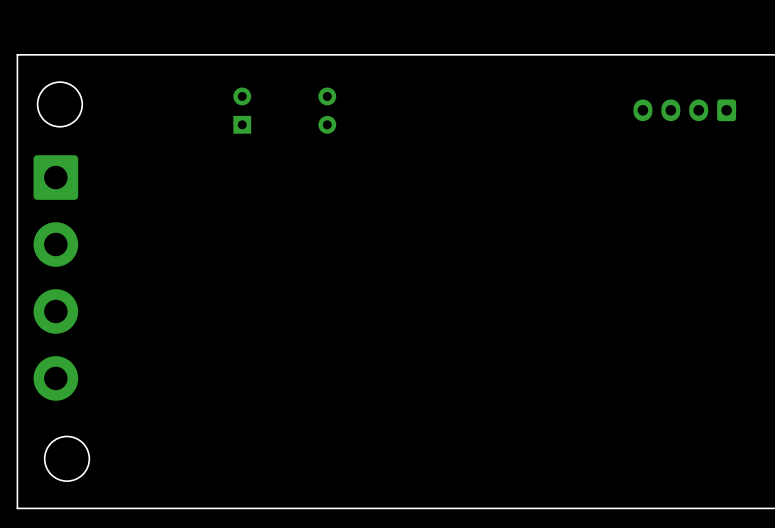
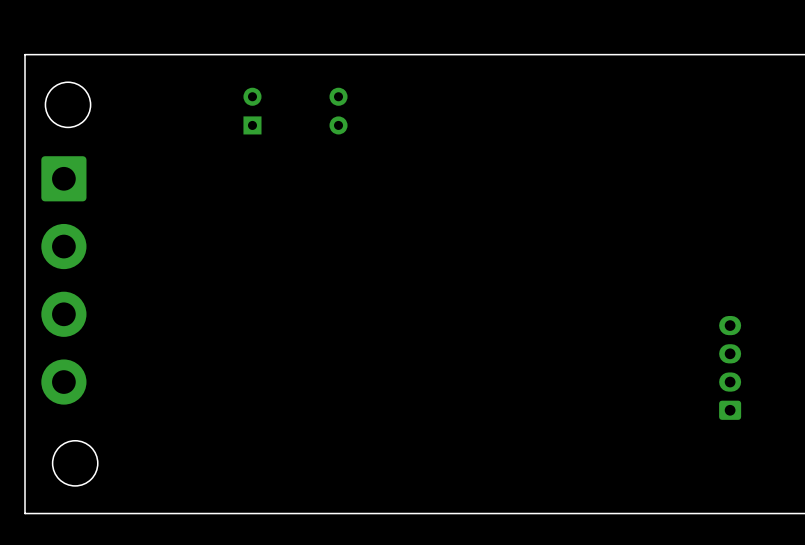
part rotation: 0° (684, 110) -> 90° clockwise (730, 367)
part position: (684, 110) -> (730, 367)

